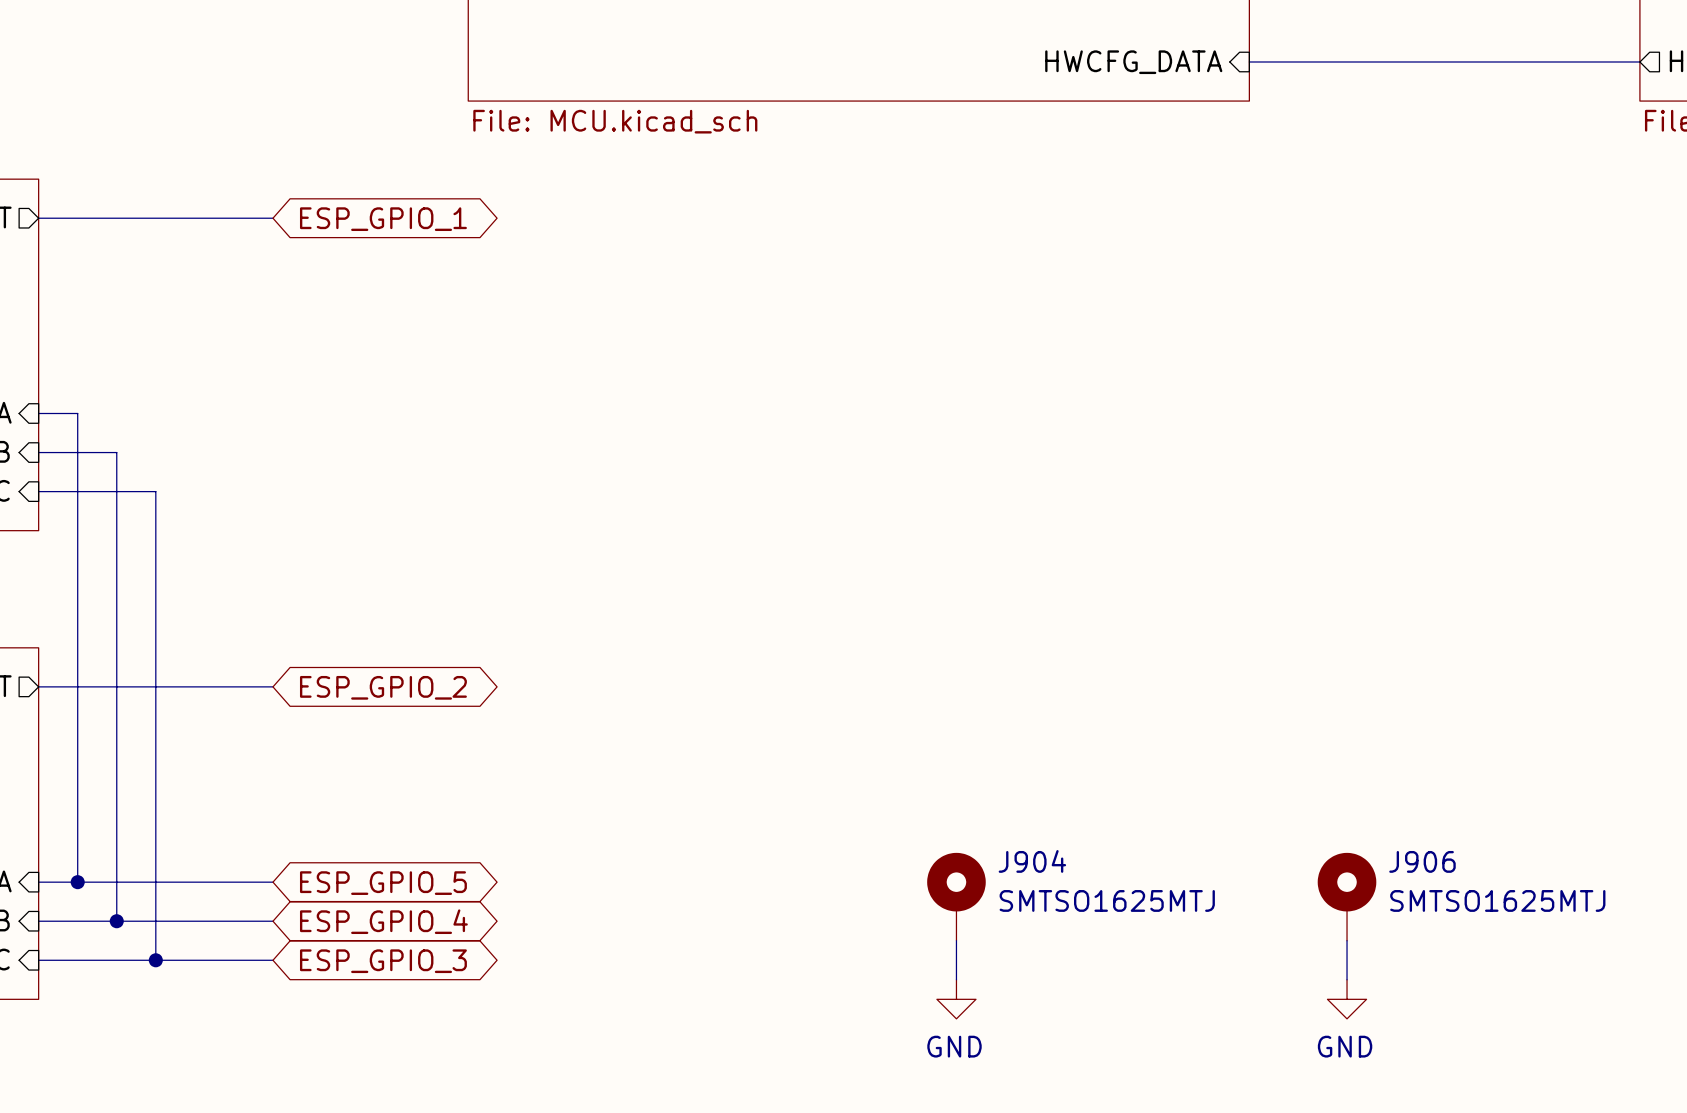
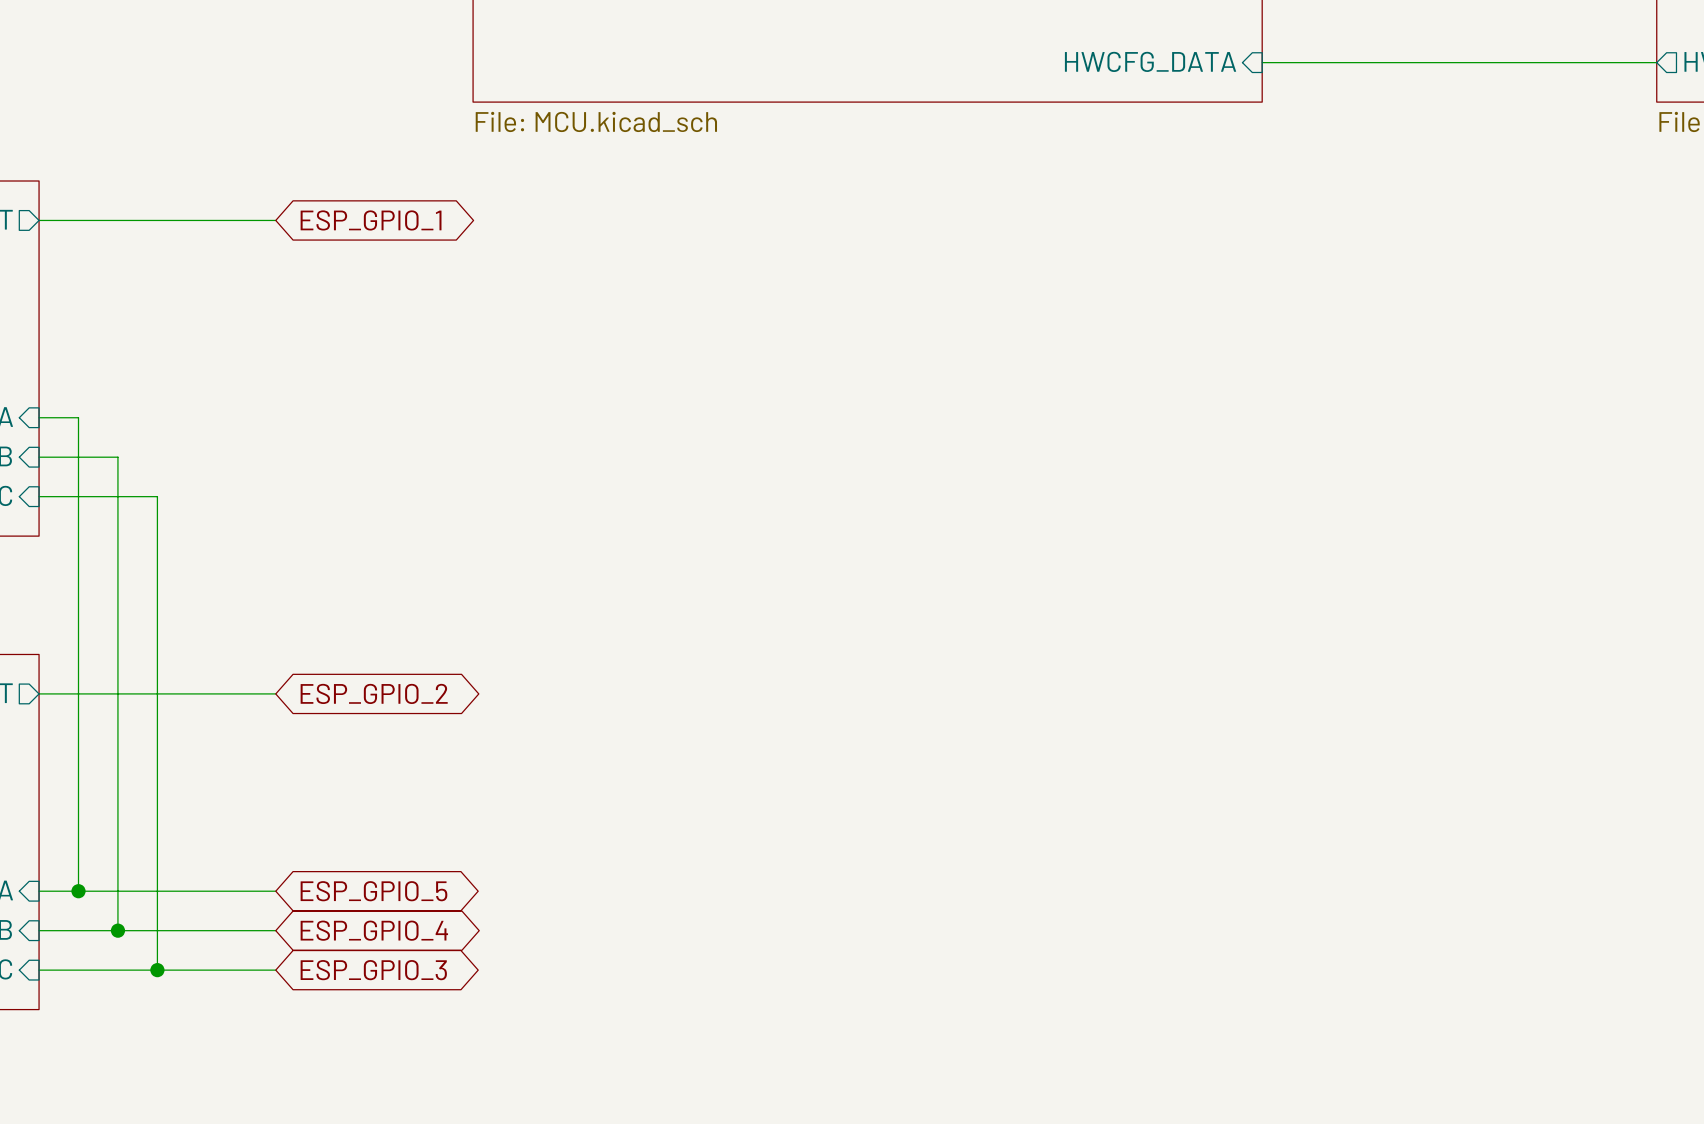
J904: SMTSO1625MTJ (956, 896) -> none
J906: SMTSO1625MTJ (1347, 896) -> none
wire: (956, 940) (956, 979) -> none
wire: (1347, 940) (1347, 979) -> none
power symbol: GND (956, 999) -> none
power symbol: GND (1347, 999) -> none

